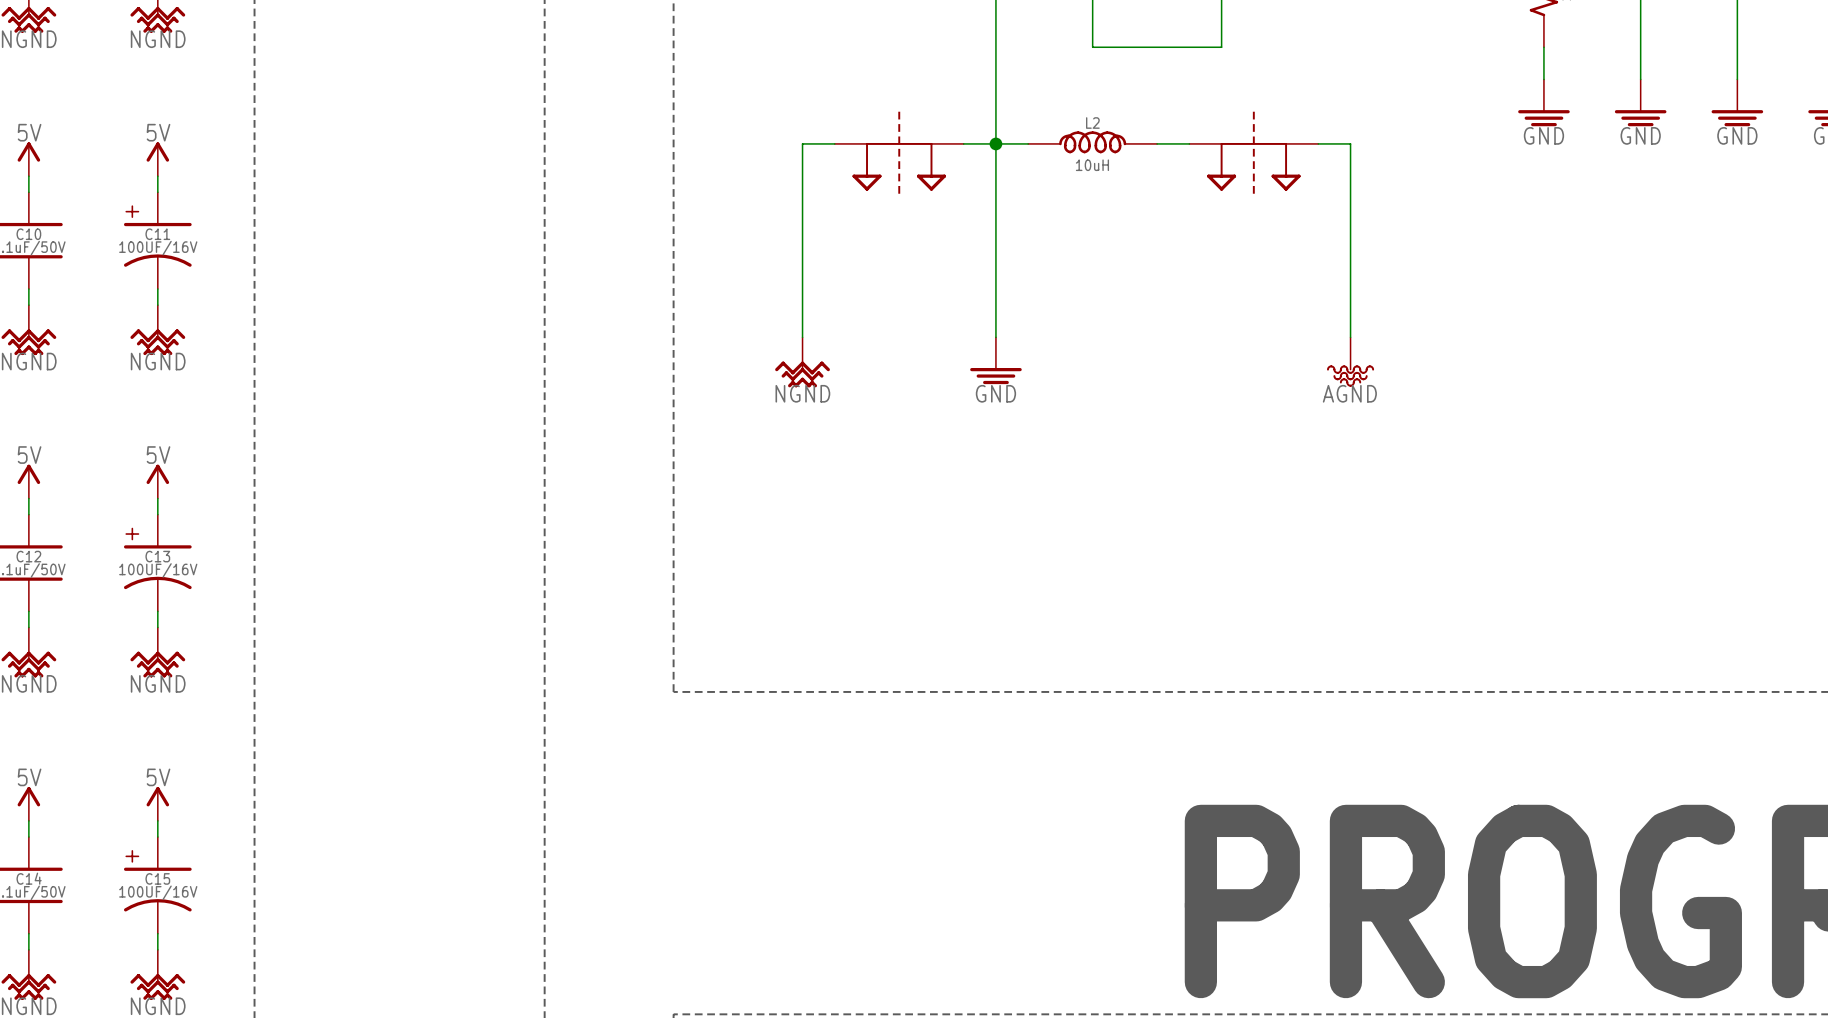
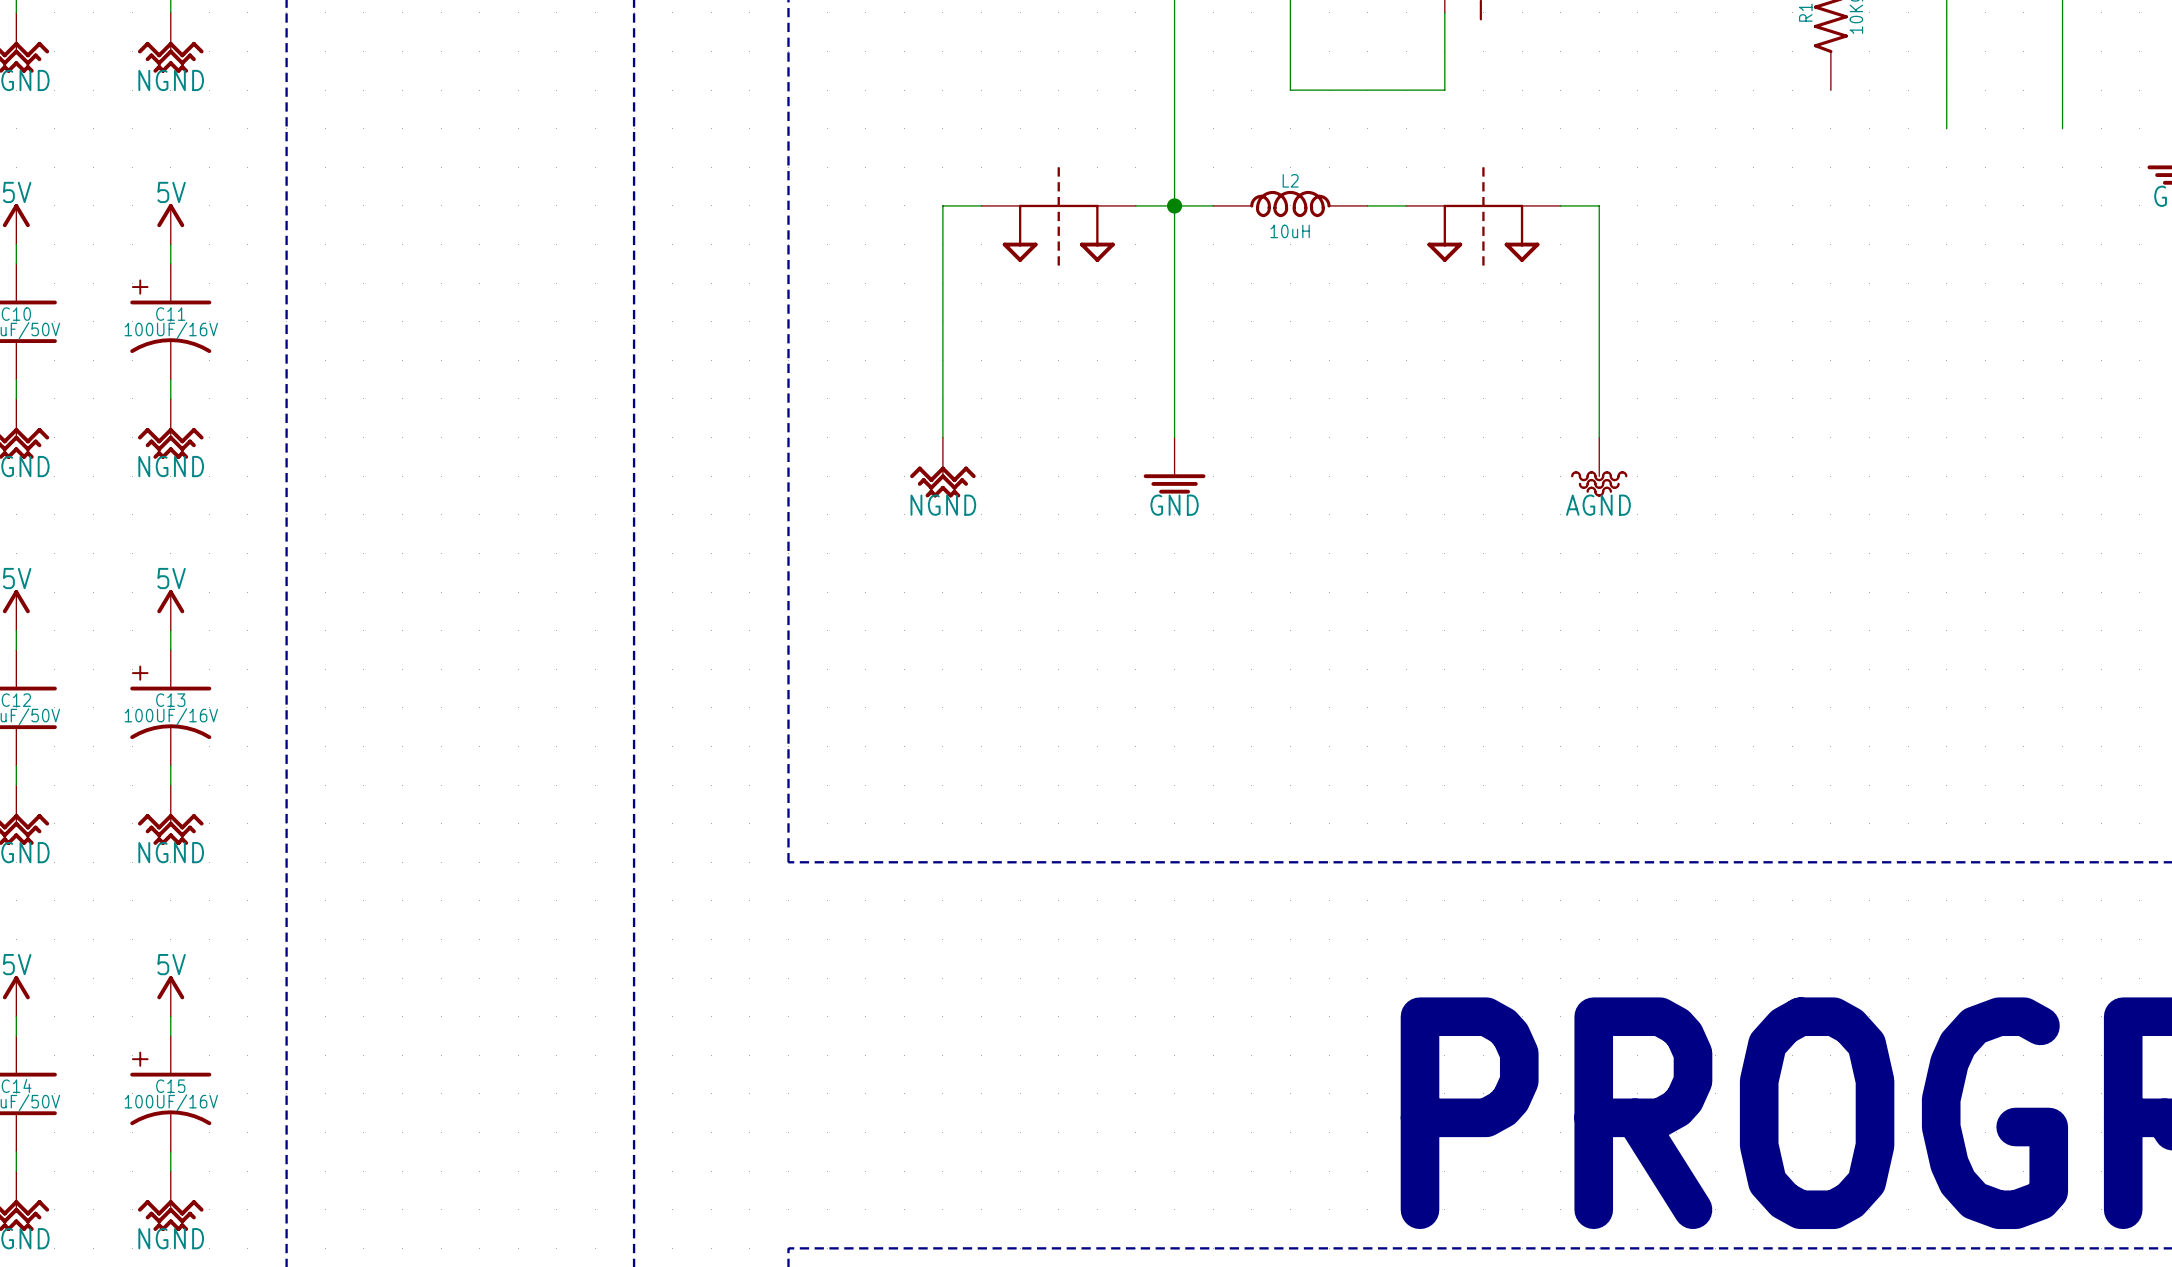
wire: (1543, 47) (1543, 79) -> none
power symbol: (1543, 102) -> none
power symbol: (1640, 102) -> none
power symbol: (1737, 102) -> none

